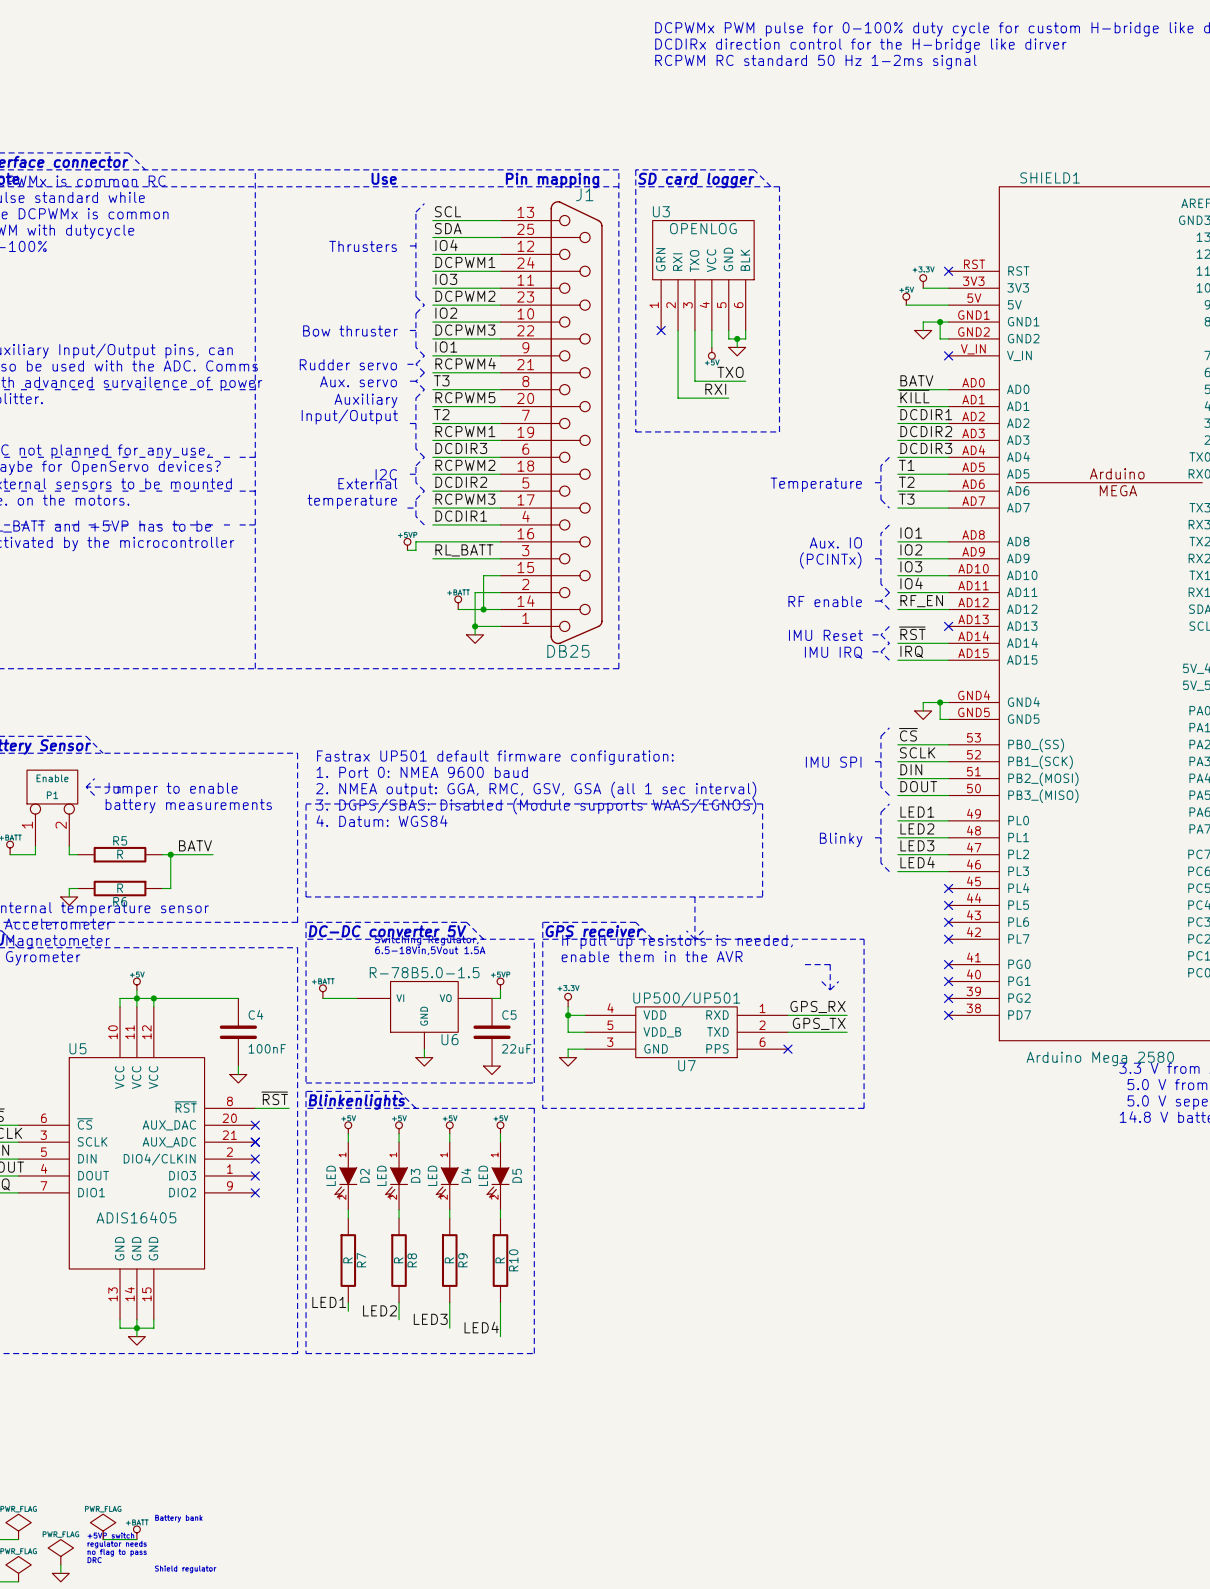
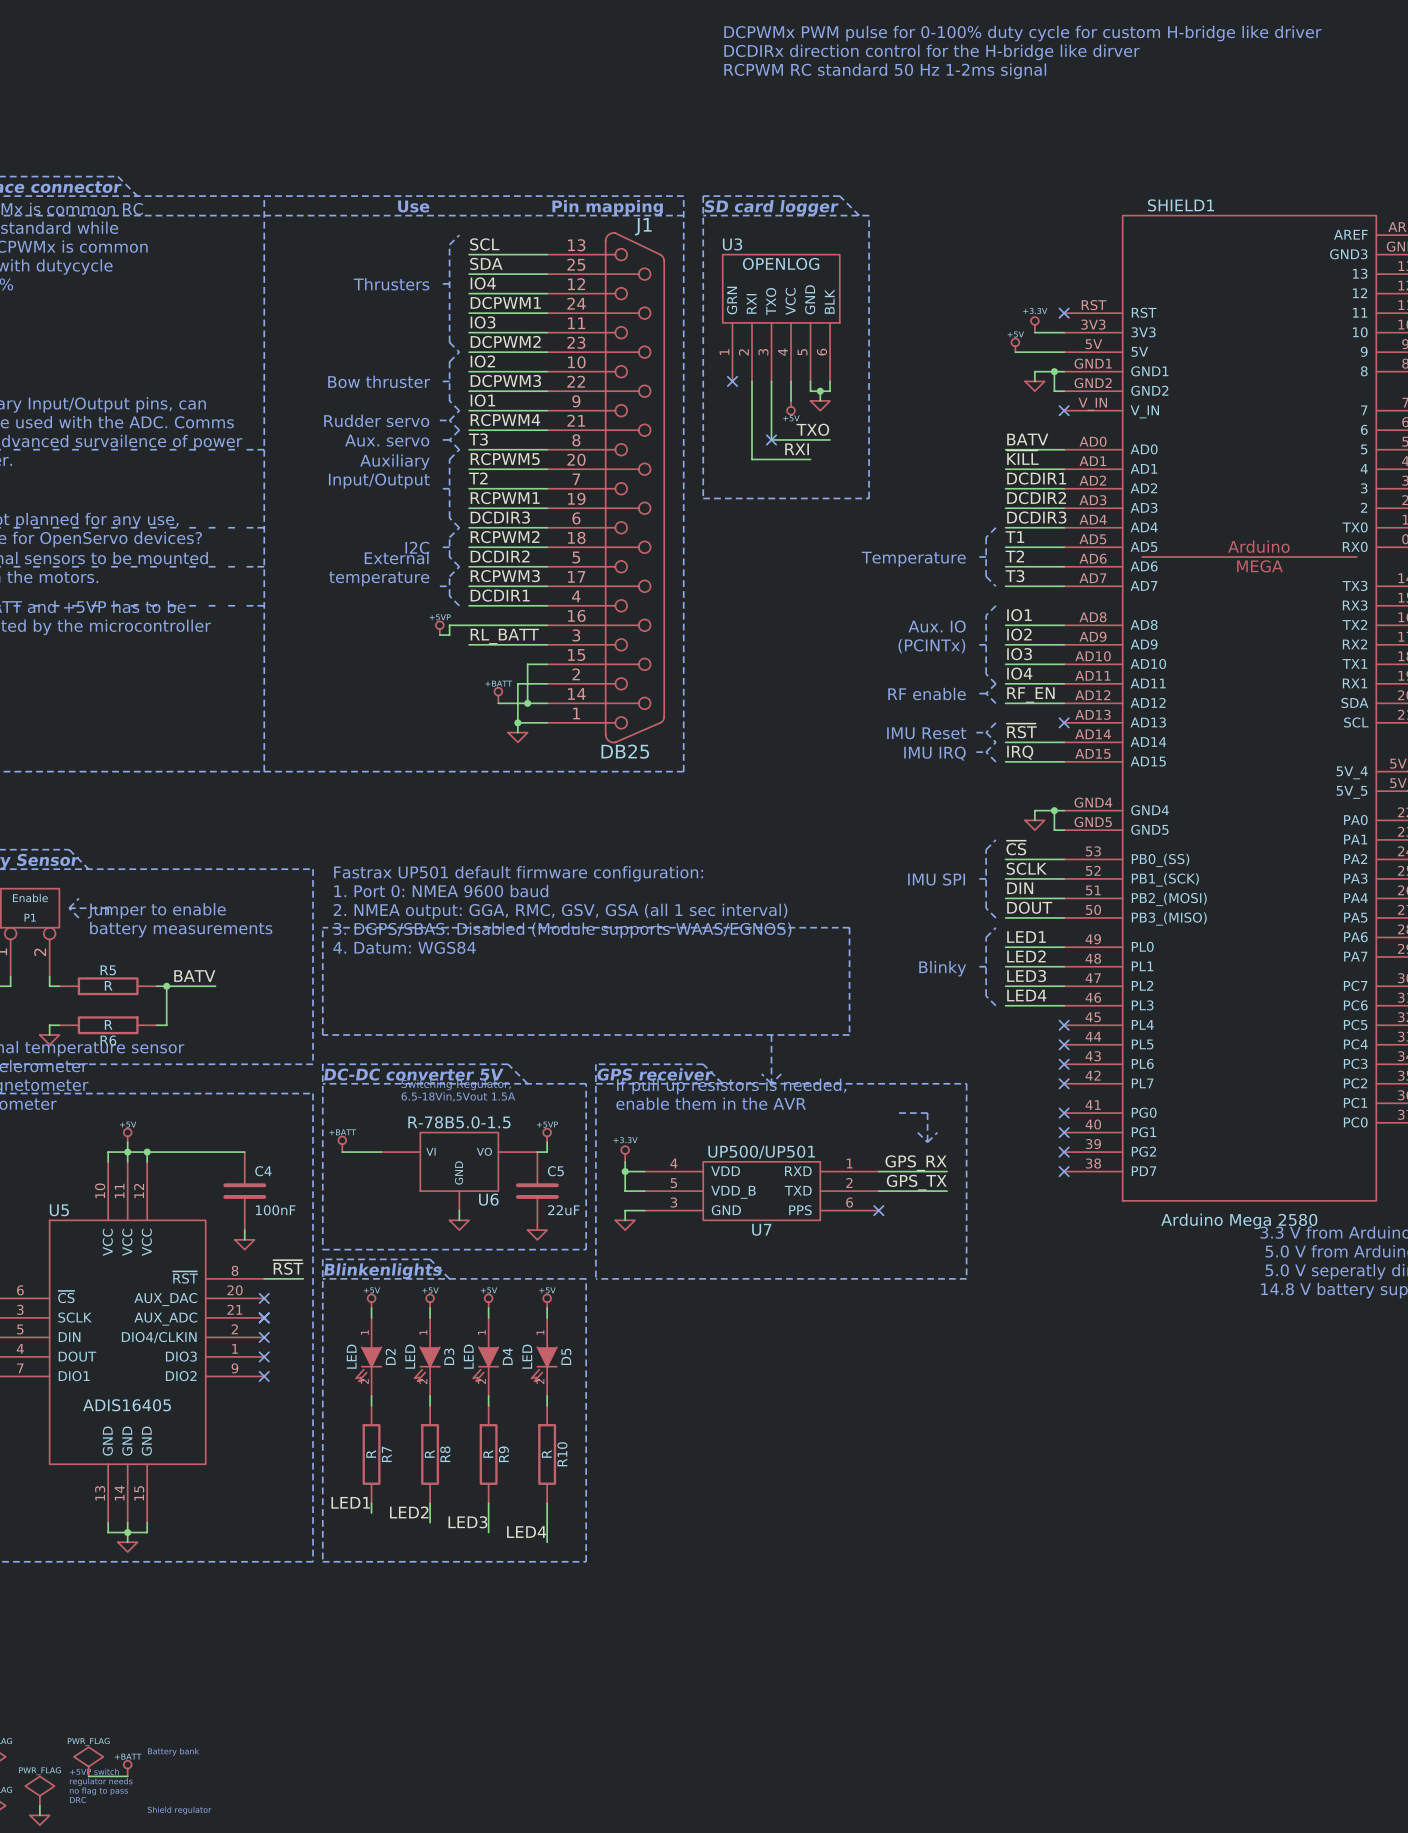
no-connect mark: none -> (771, 439)

